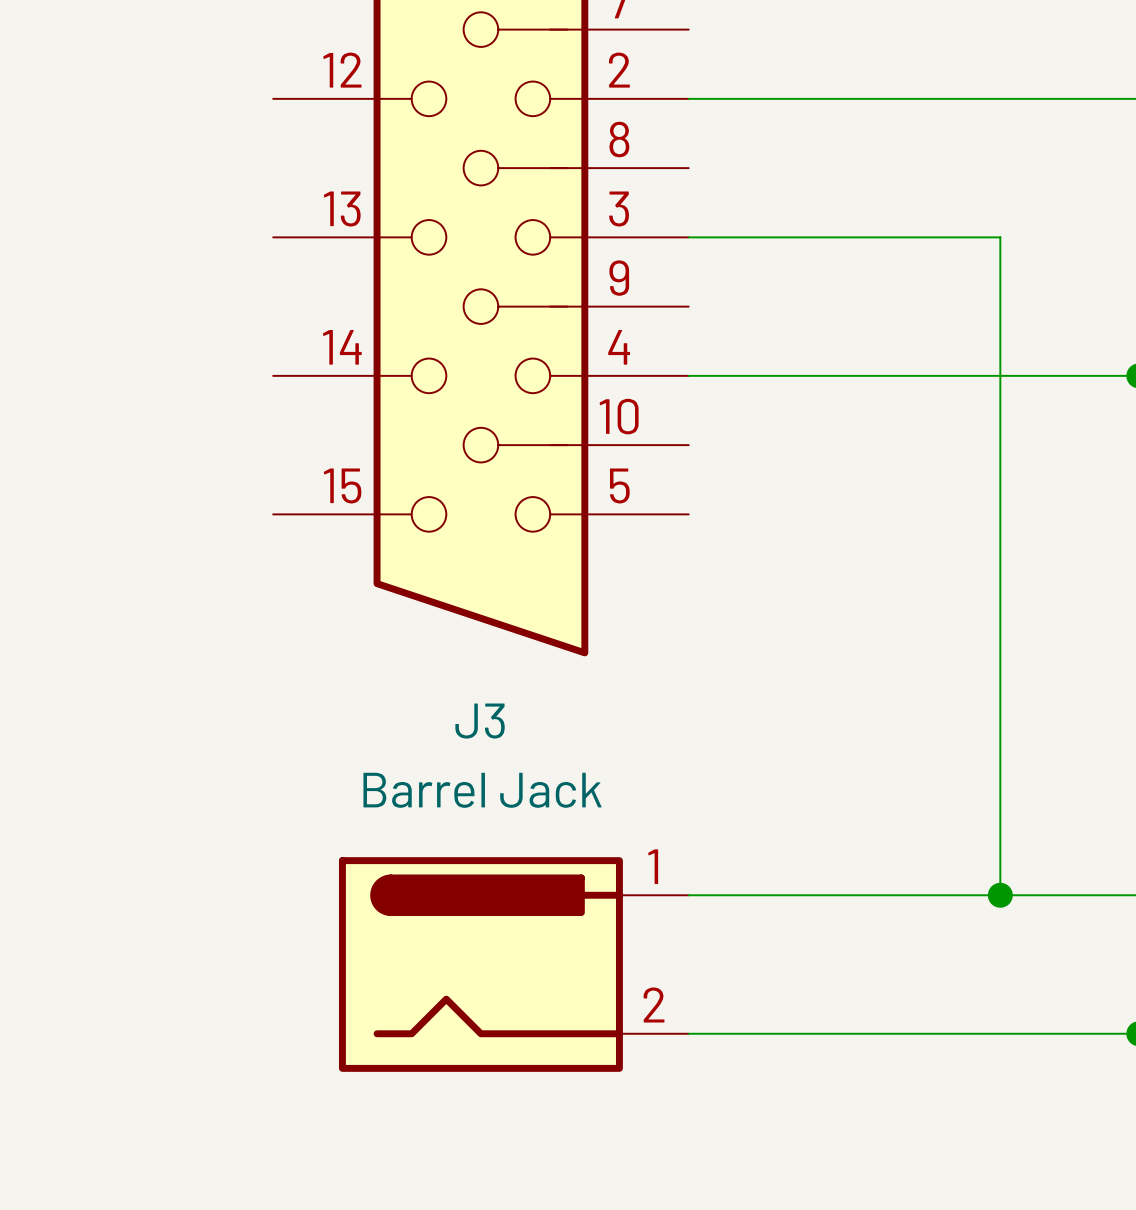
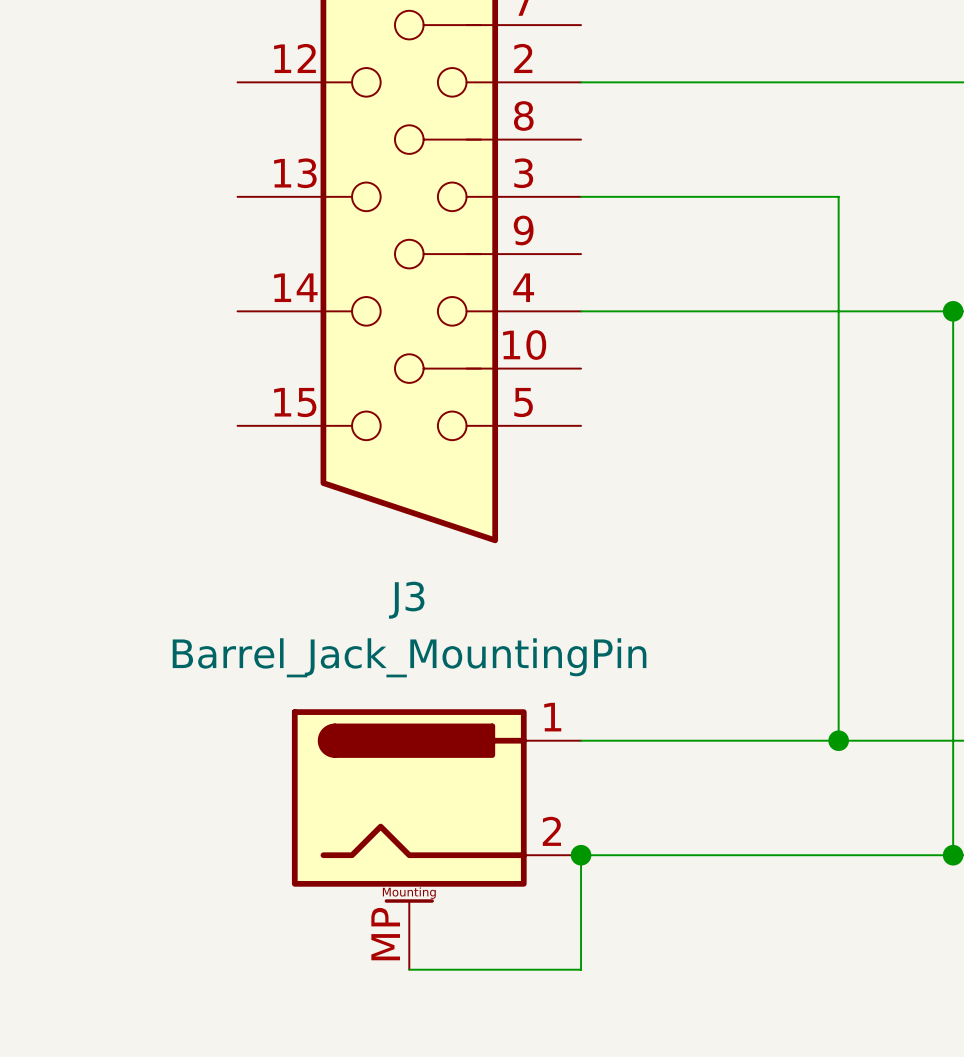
J3 value: Barrel Jack (482, 790) -> Barrel_Jack_MountingPin (409, 657)
J3 symbol: [338, 857, 689, 1072] -> [291, 709, 582, 970]
wire: none -> (581, 855) (581, 969) (409, 969)
junction: none -> (581, 855)

